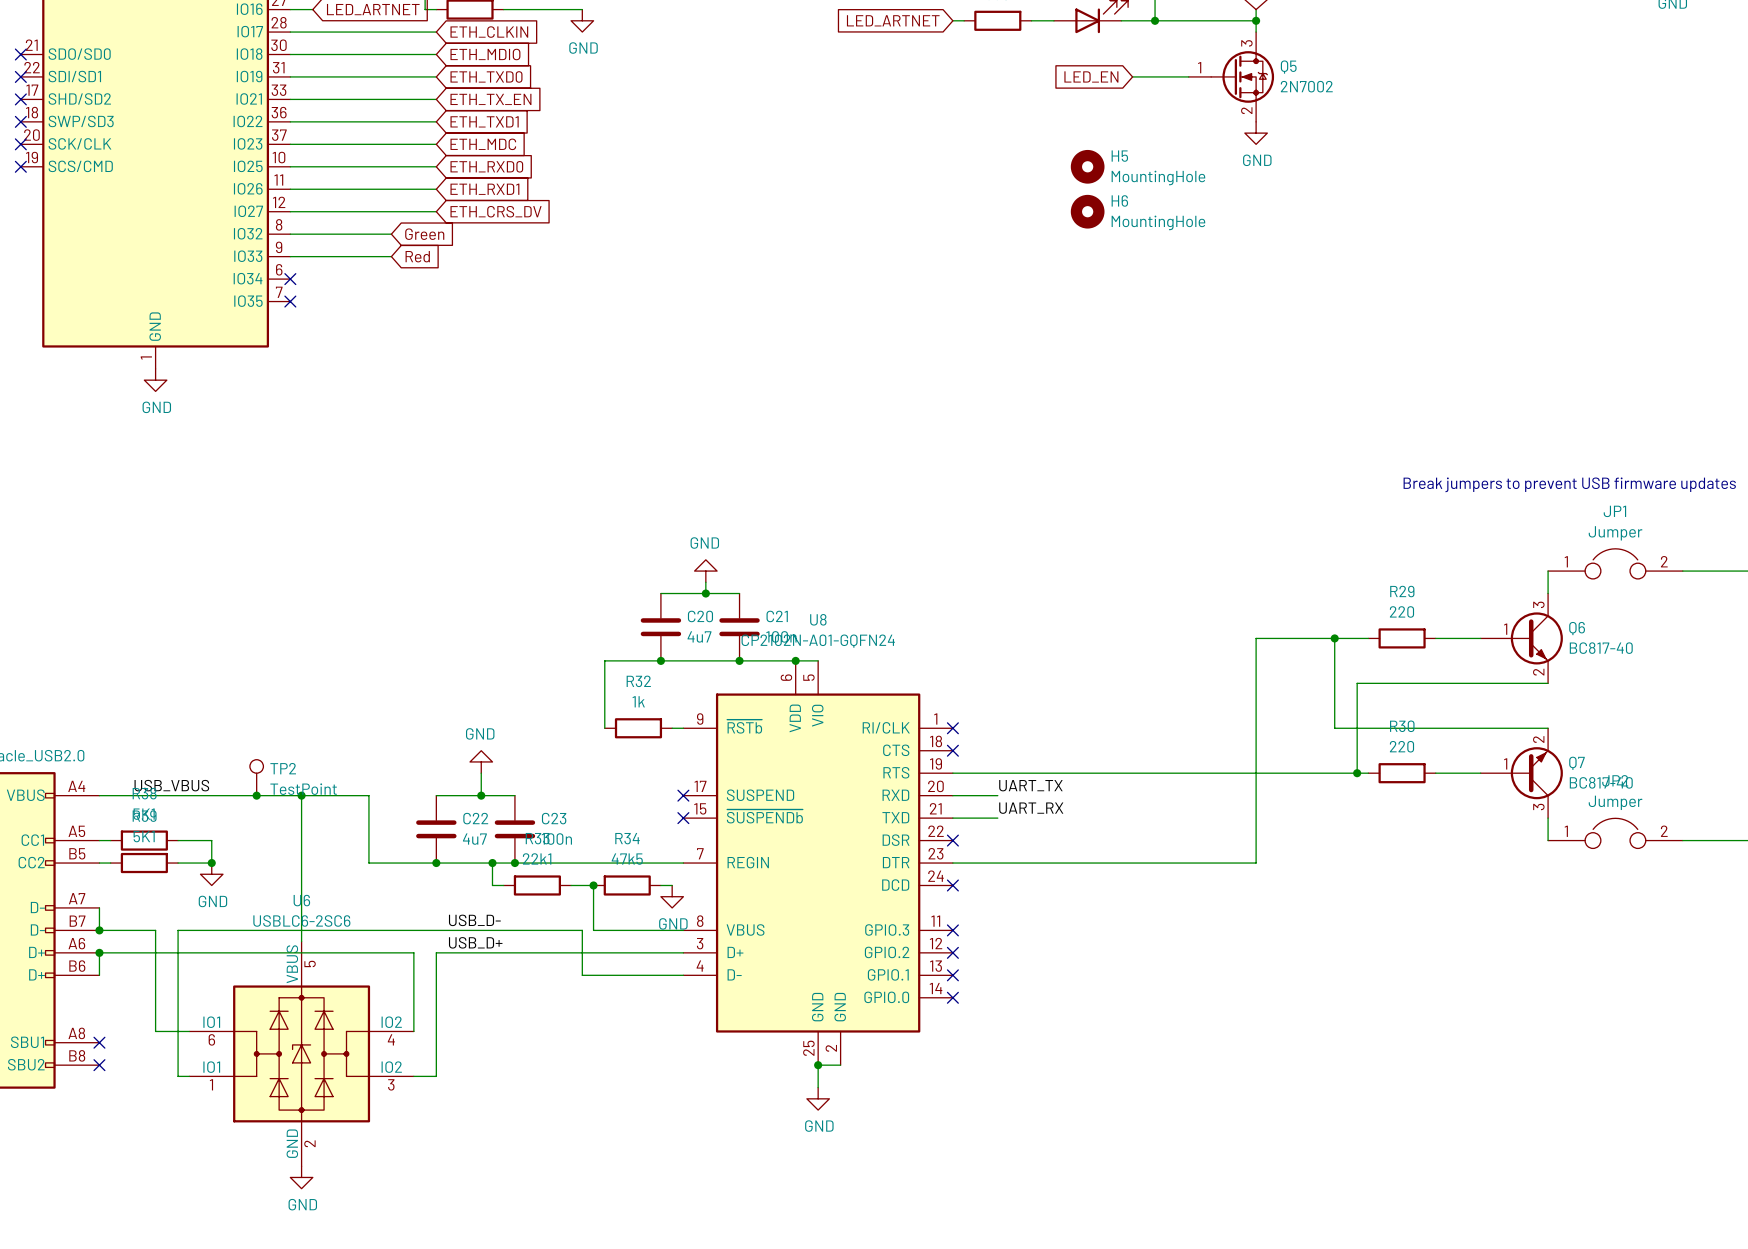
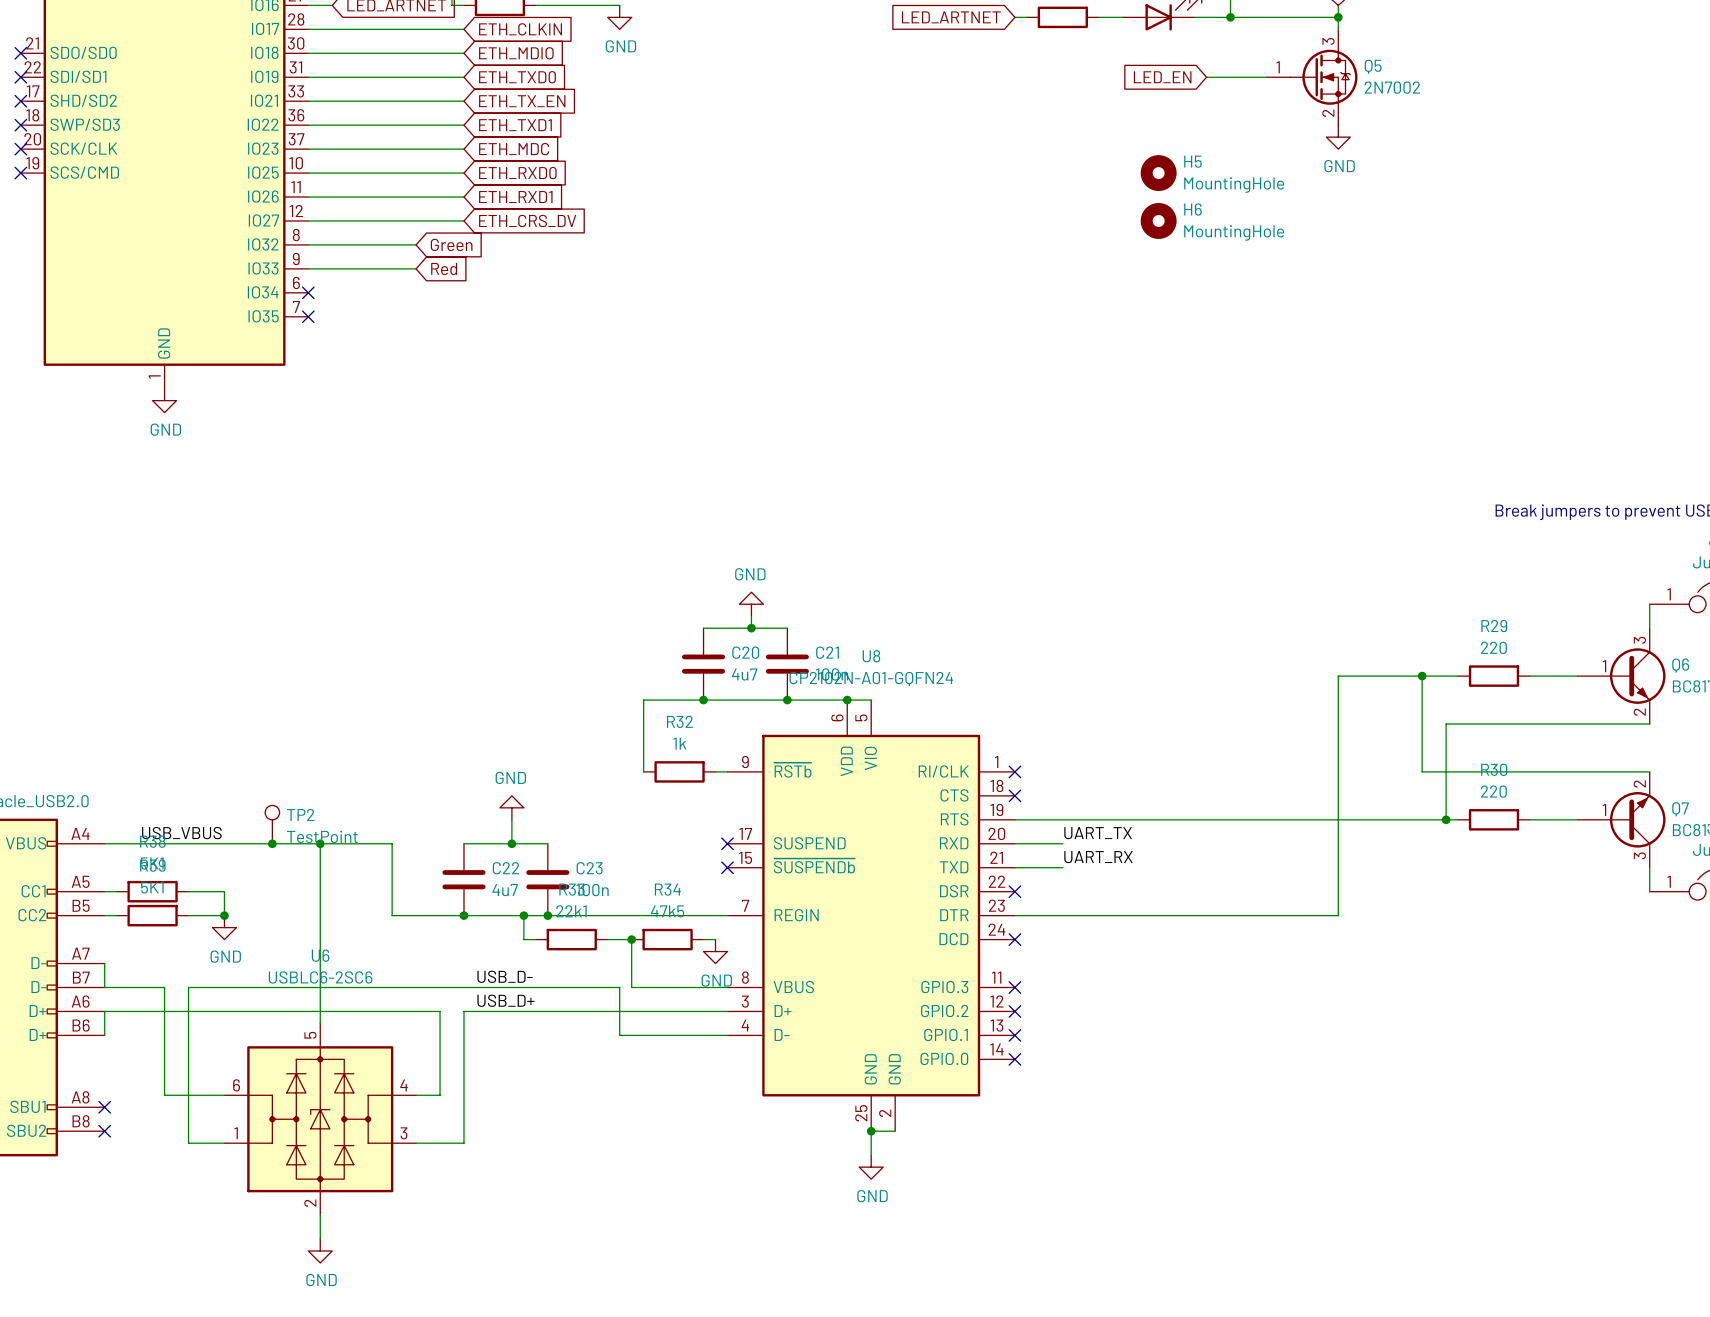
junction: (99, 930) -> none
U6 symbol: [189, 941, 414, 1167] -> [224, 1023, 417, 1216]
junction: (99, 952) -> none

